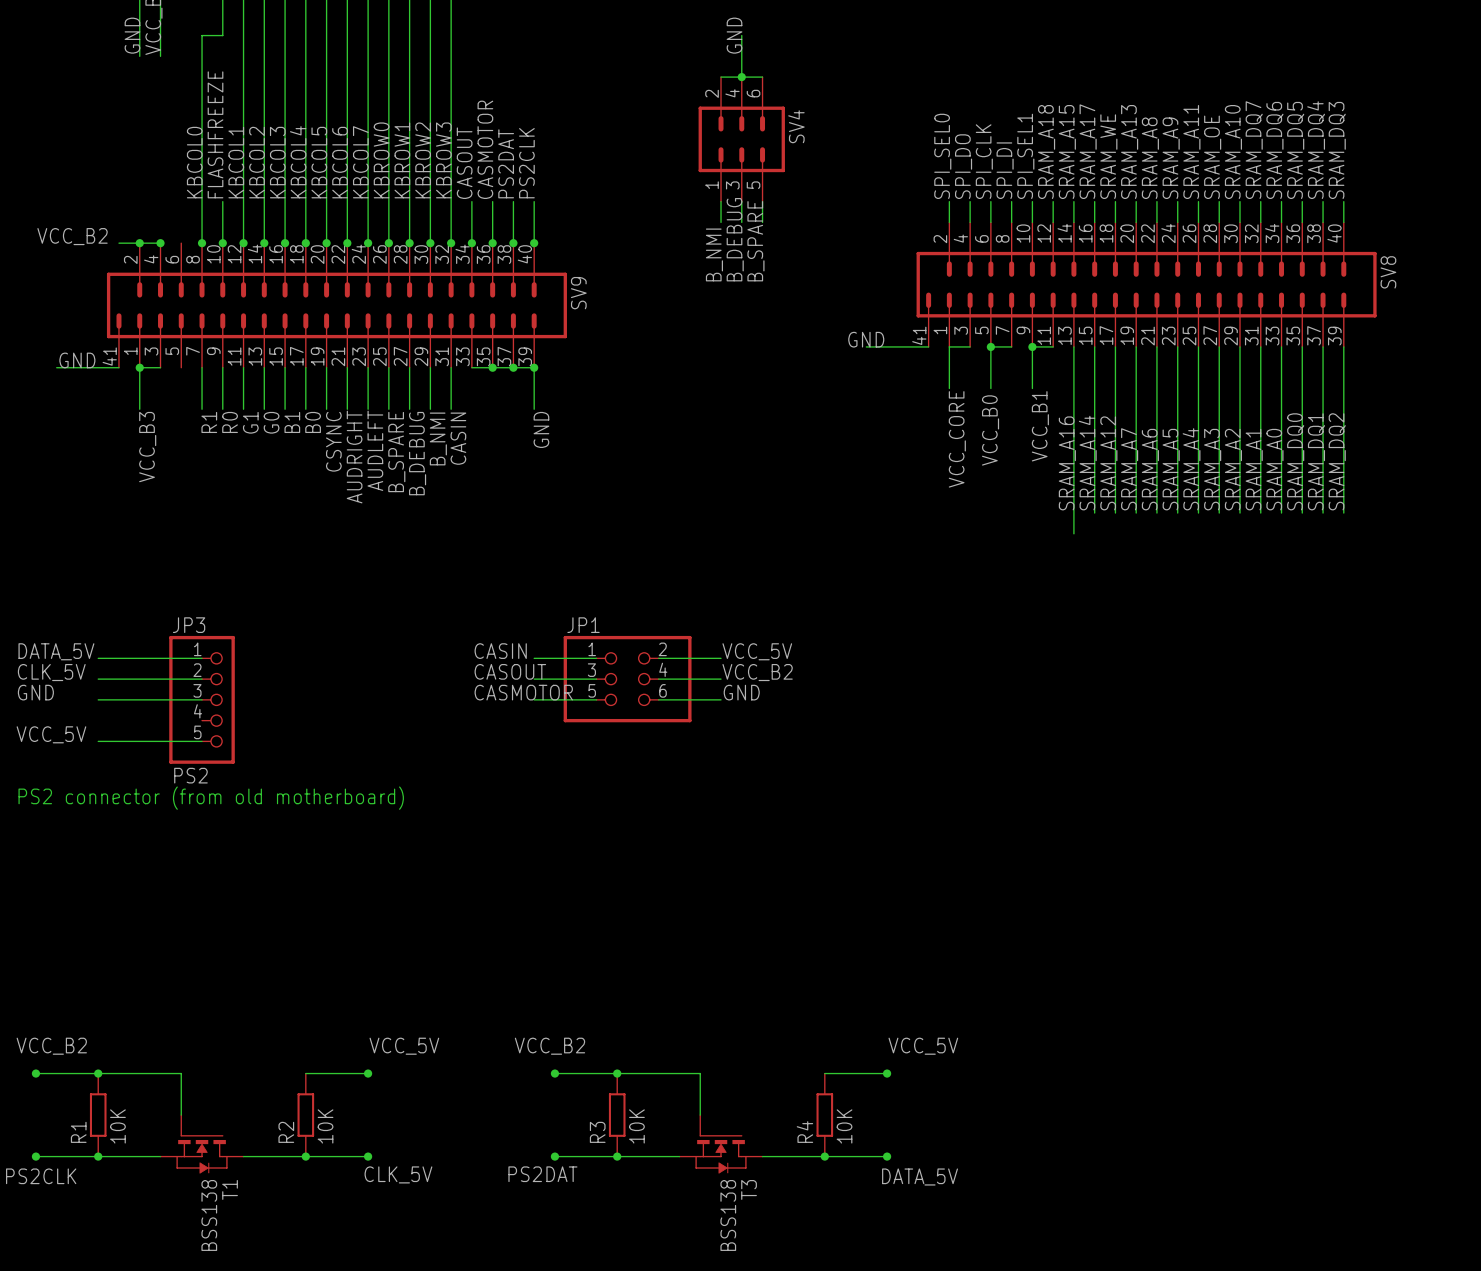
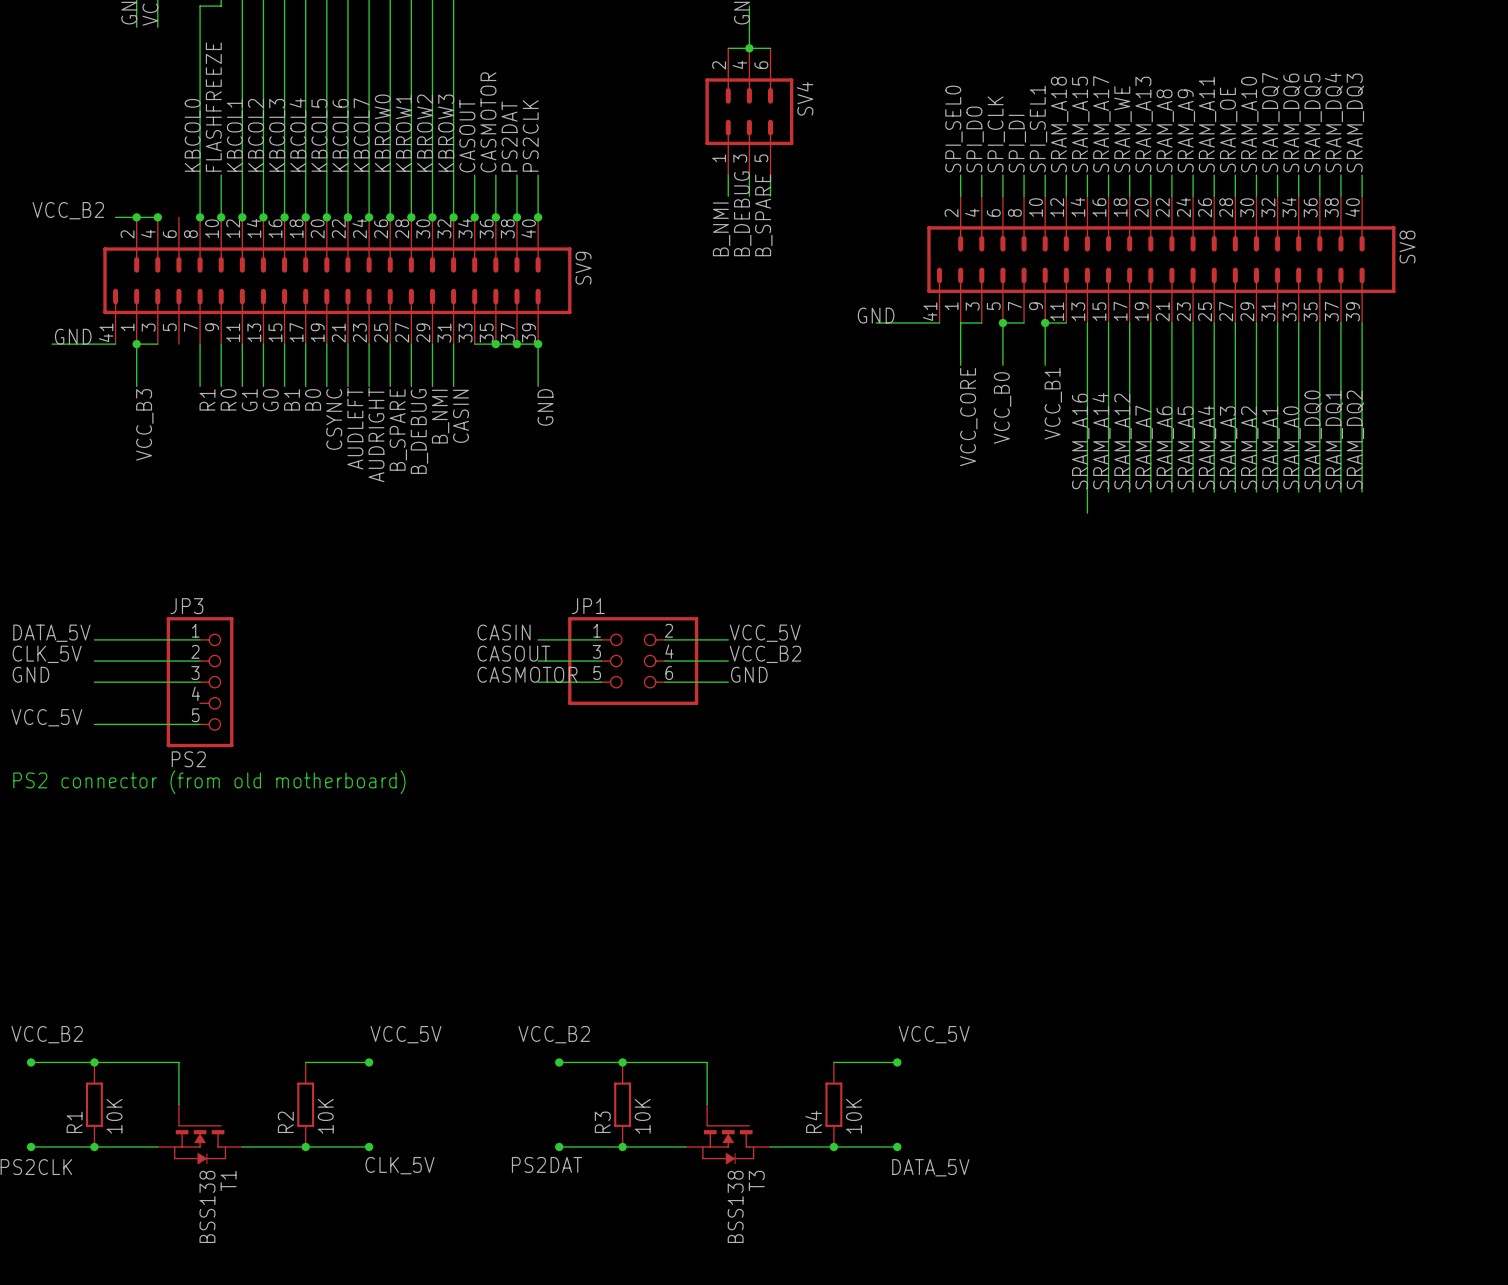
label: AUDLEFT (375, 450) -> AUDRIGHT (376, 435)
label: AUDRIGHT (354, 457) -> AUDLEFT (355, 428)

